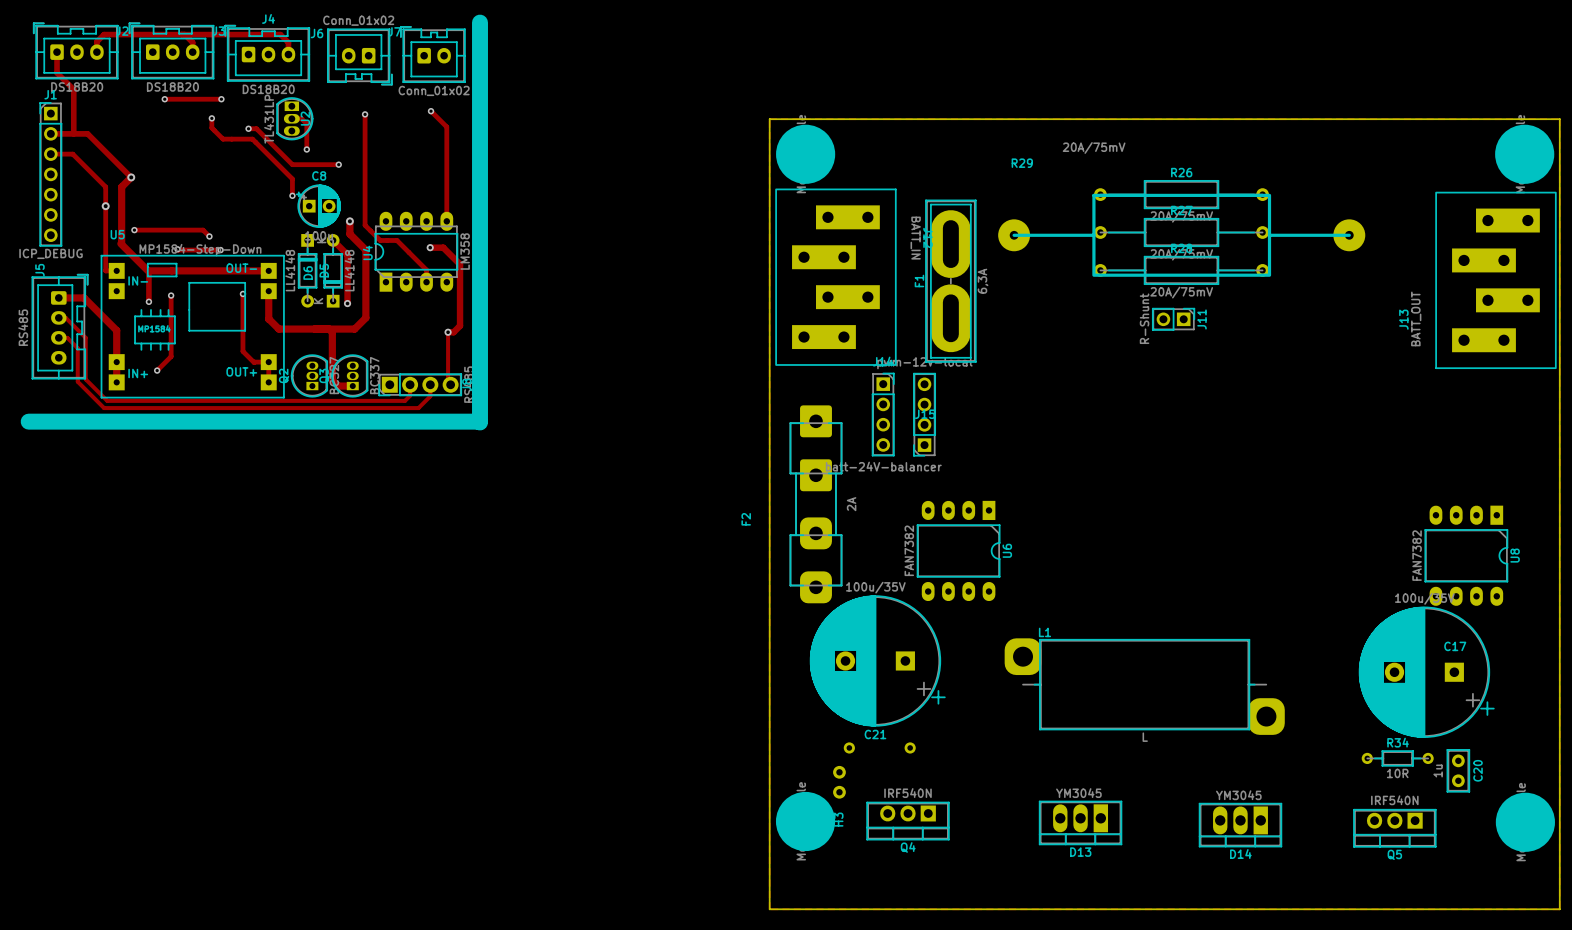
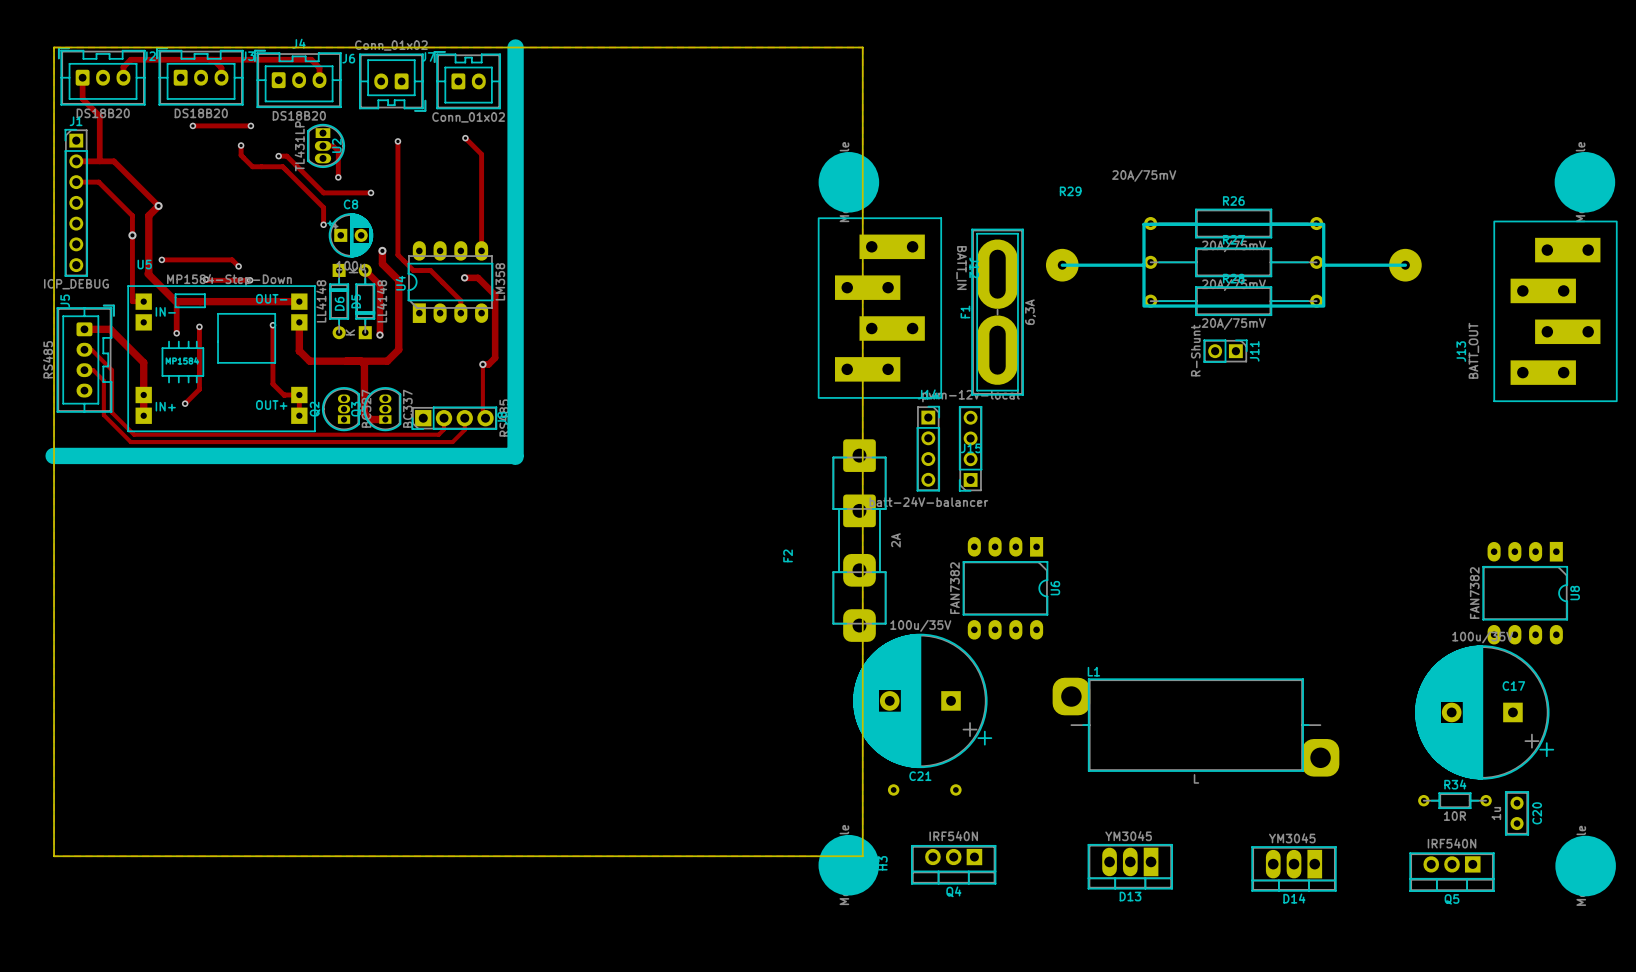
board edge: none -> (54, 47) (862, 47) (862, 856) (54, 856) (54, 47)
board edge: (769, 119) (1559, 119) (1559, 909) (769, 909) (769, 119) -> none
part: (839, 782) -> none

